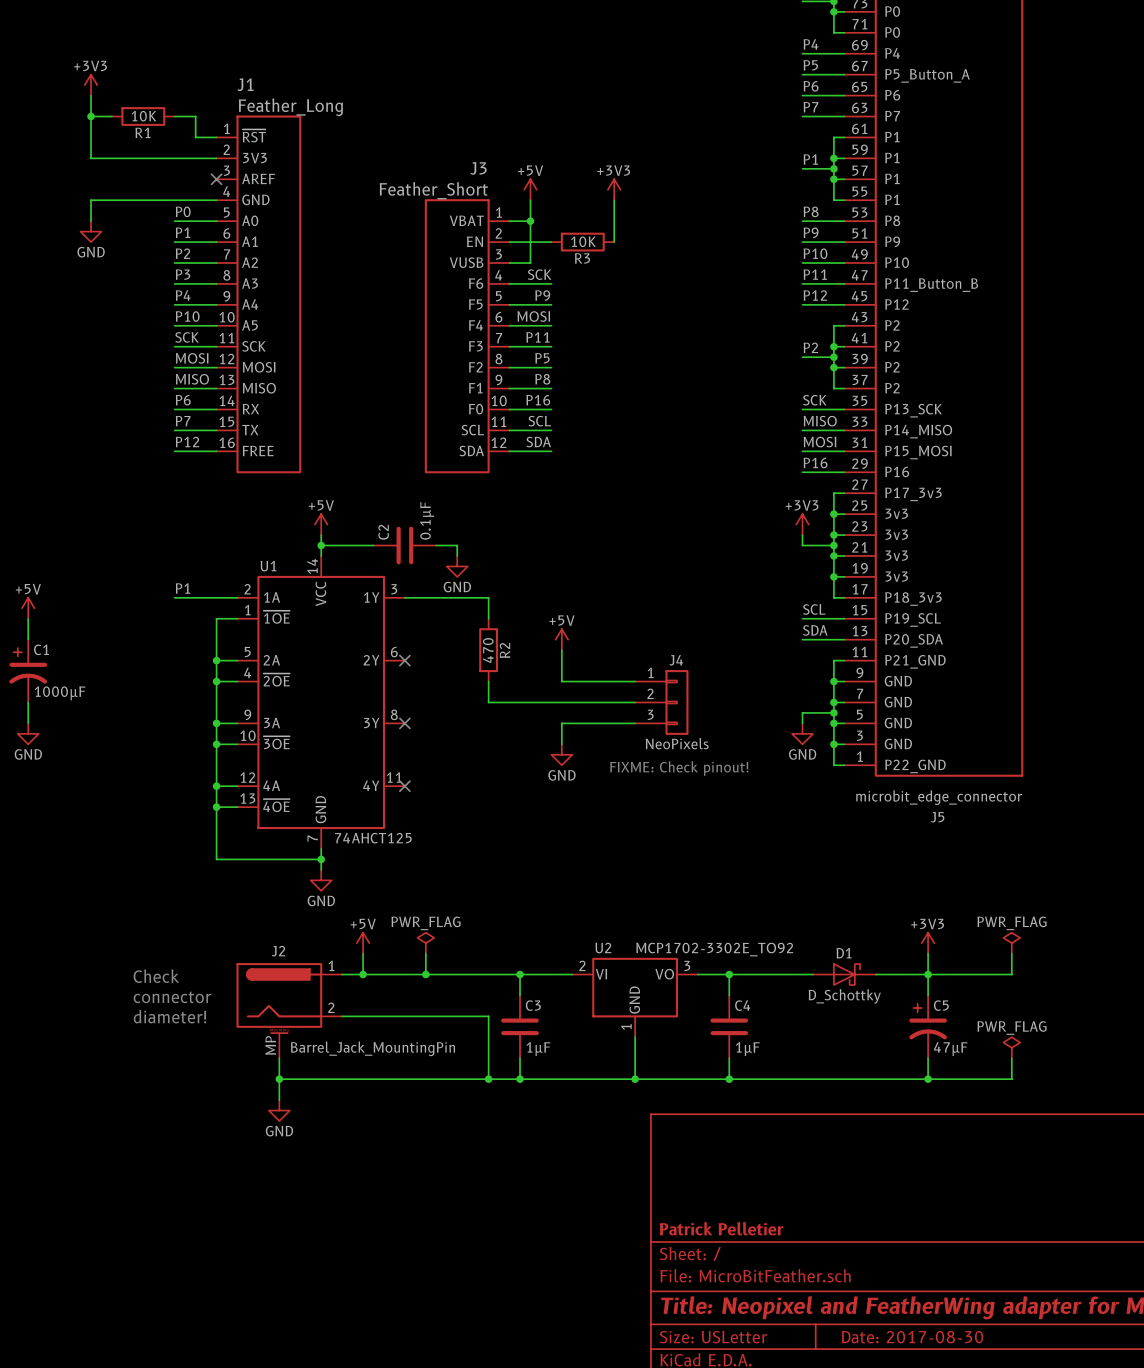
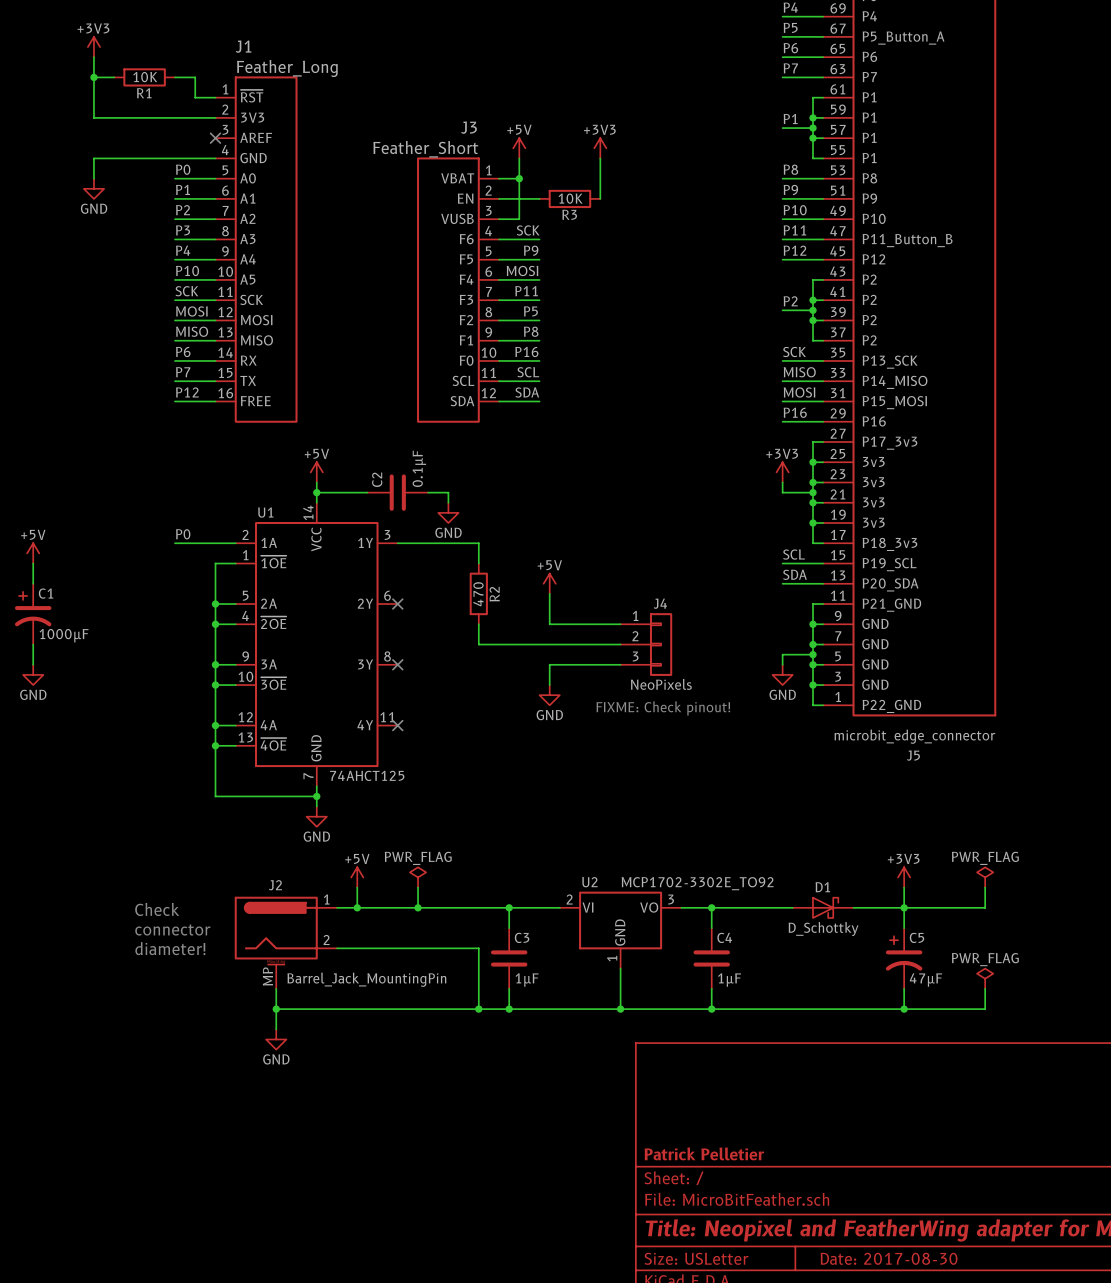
label: P1 (182, 588) -> P0 (183, 534)

